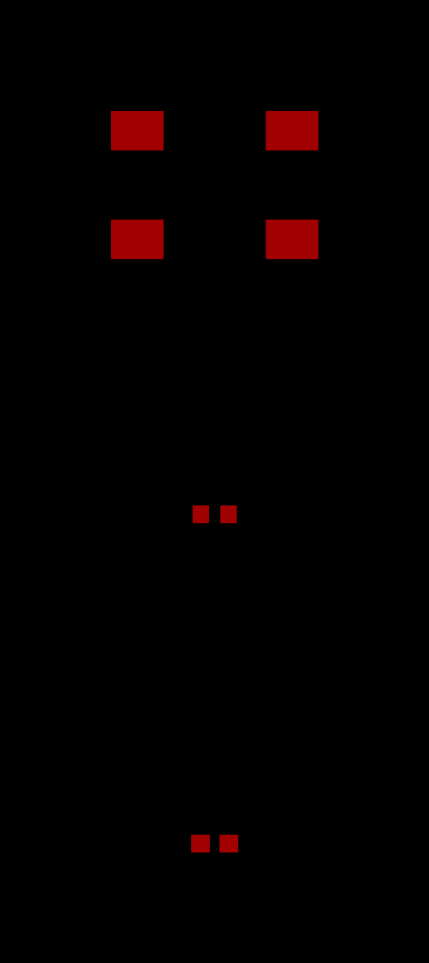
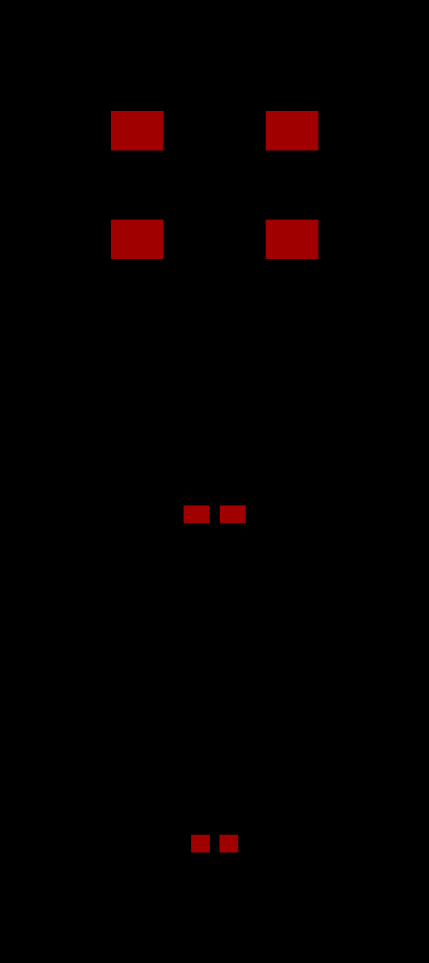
part footprint: [192, 505, 237, 524] -> [183, 505, 246, 524]

